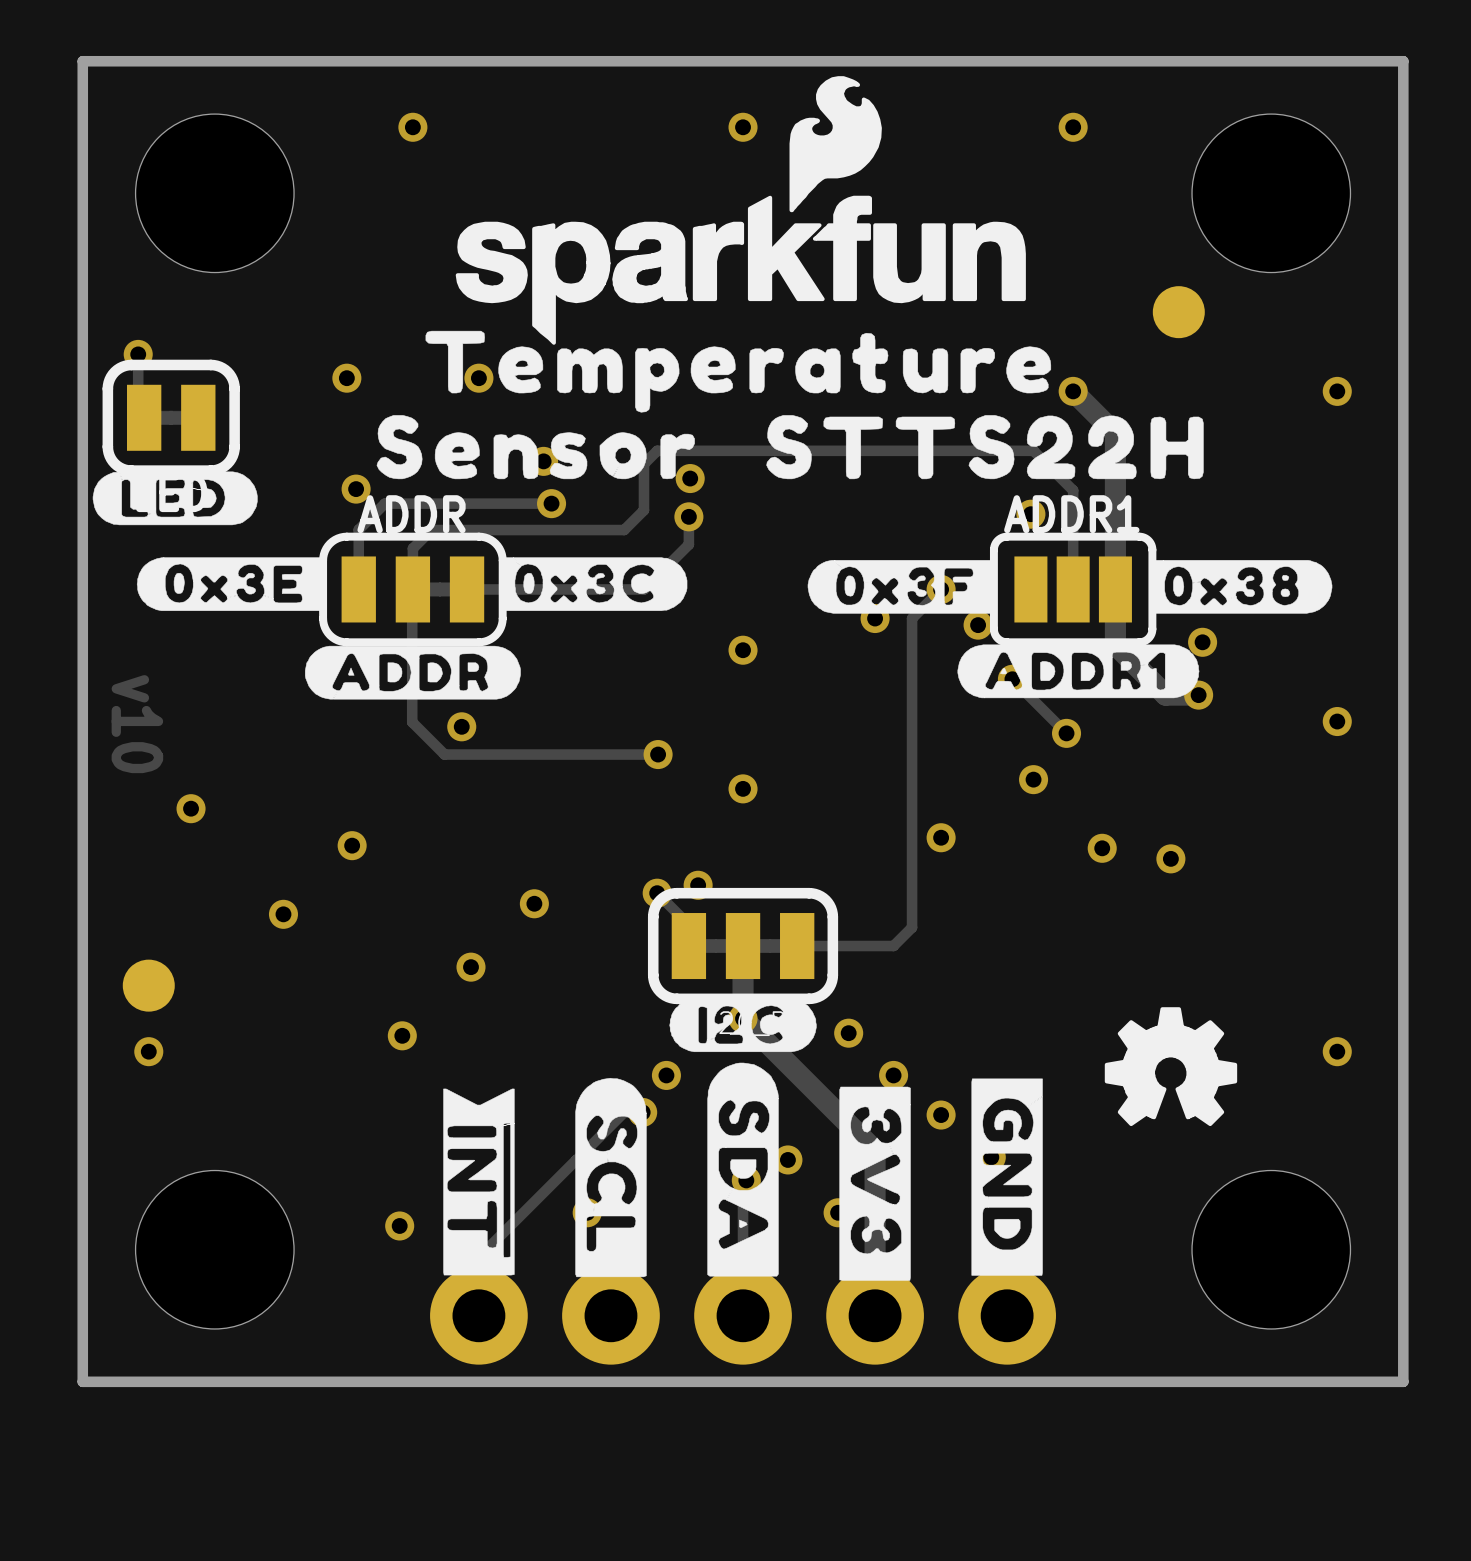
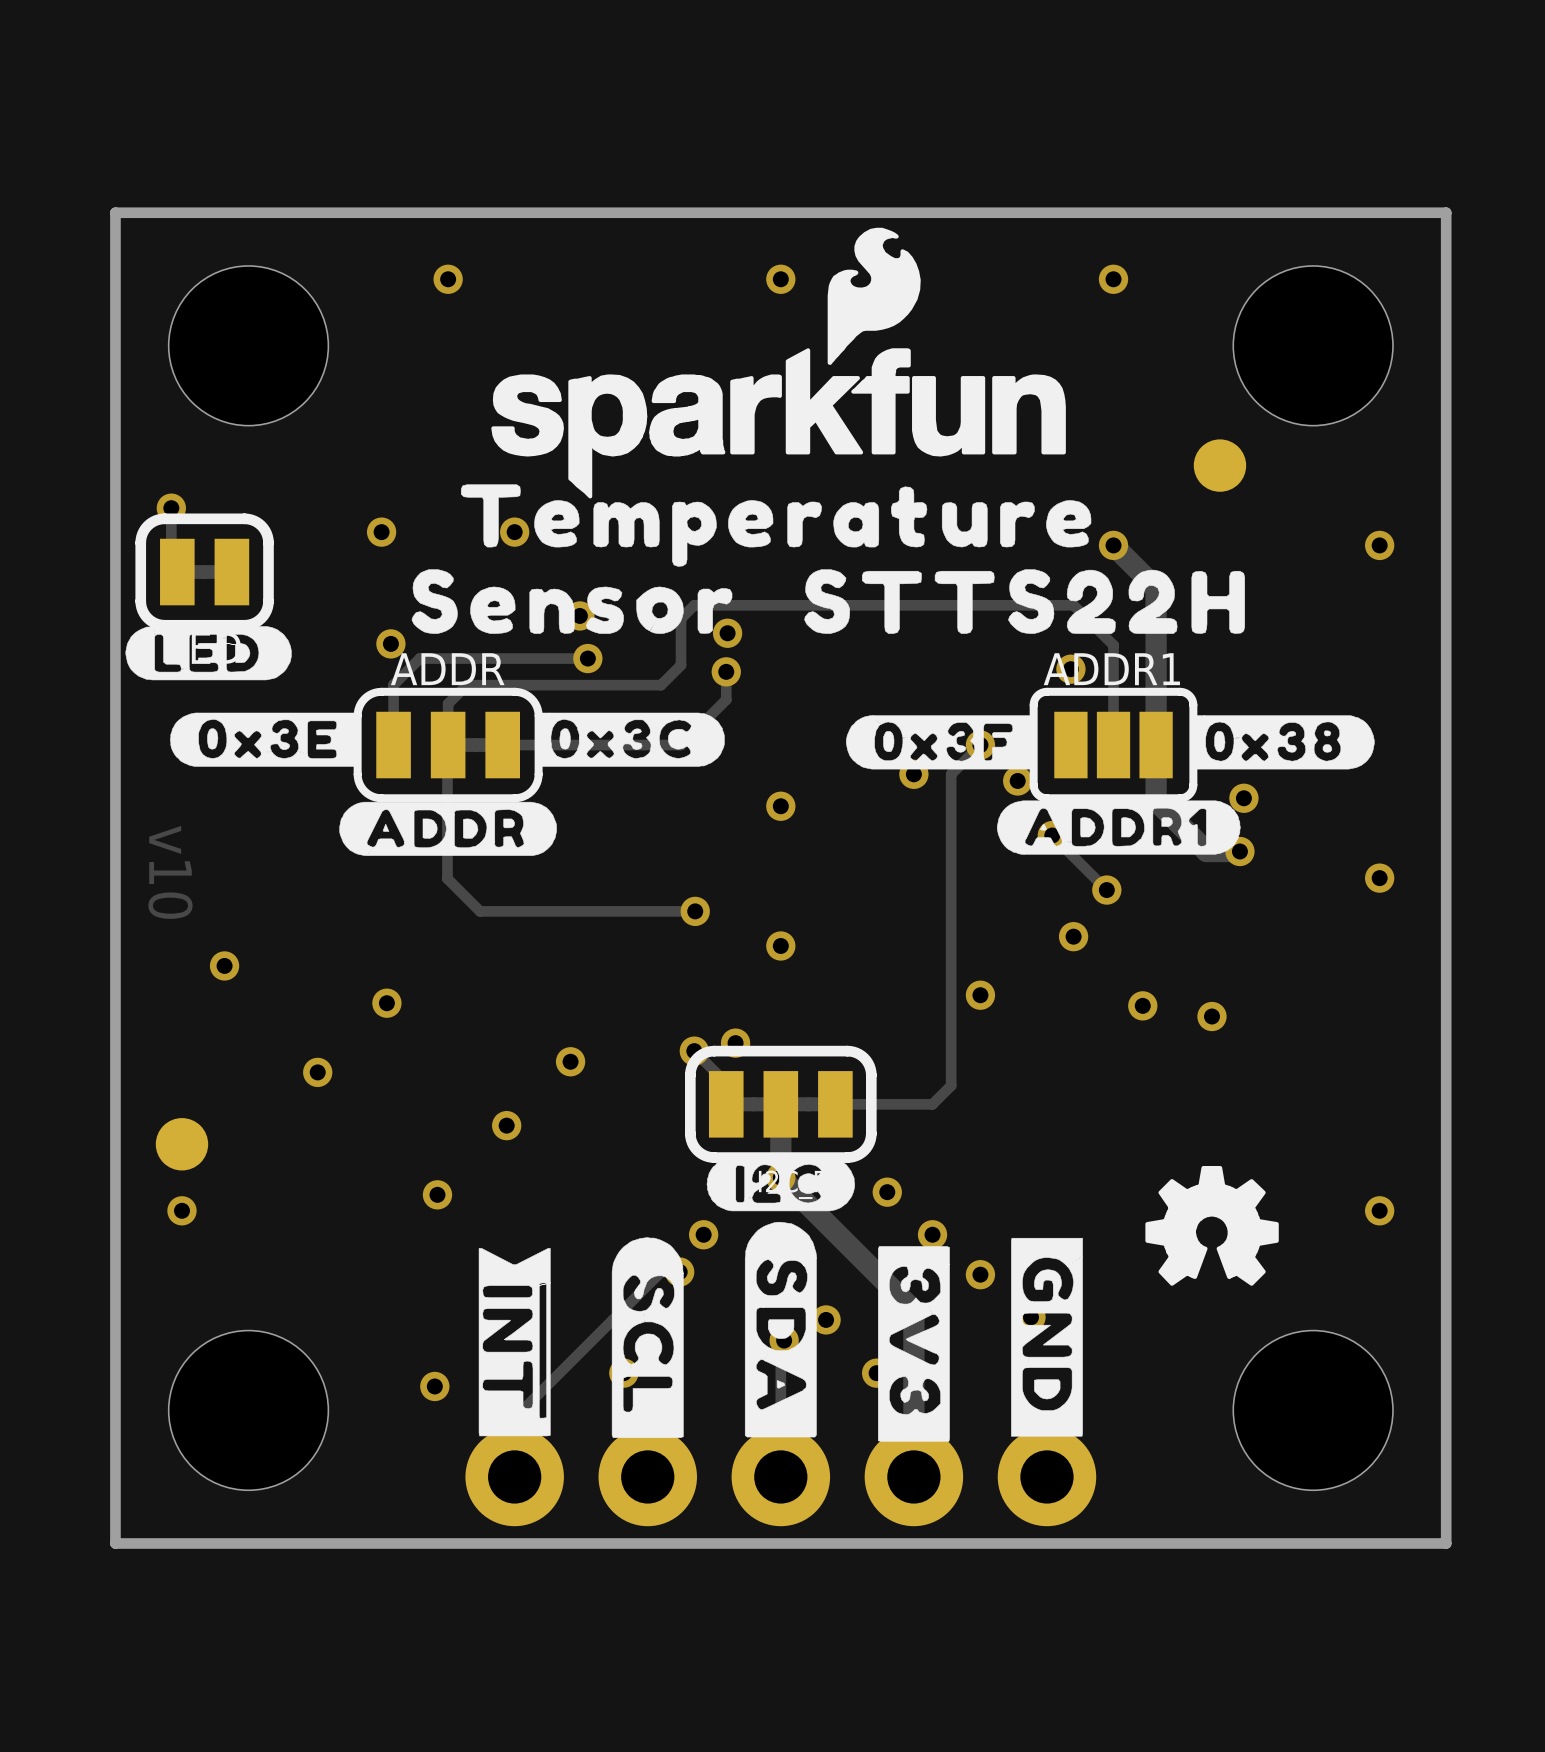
via: (461, 726) -> none

